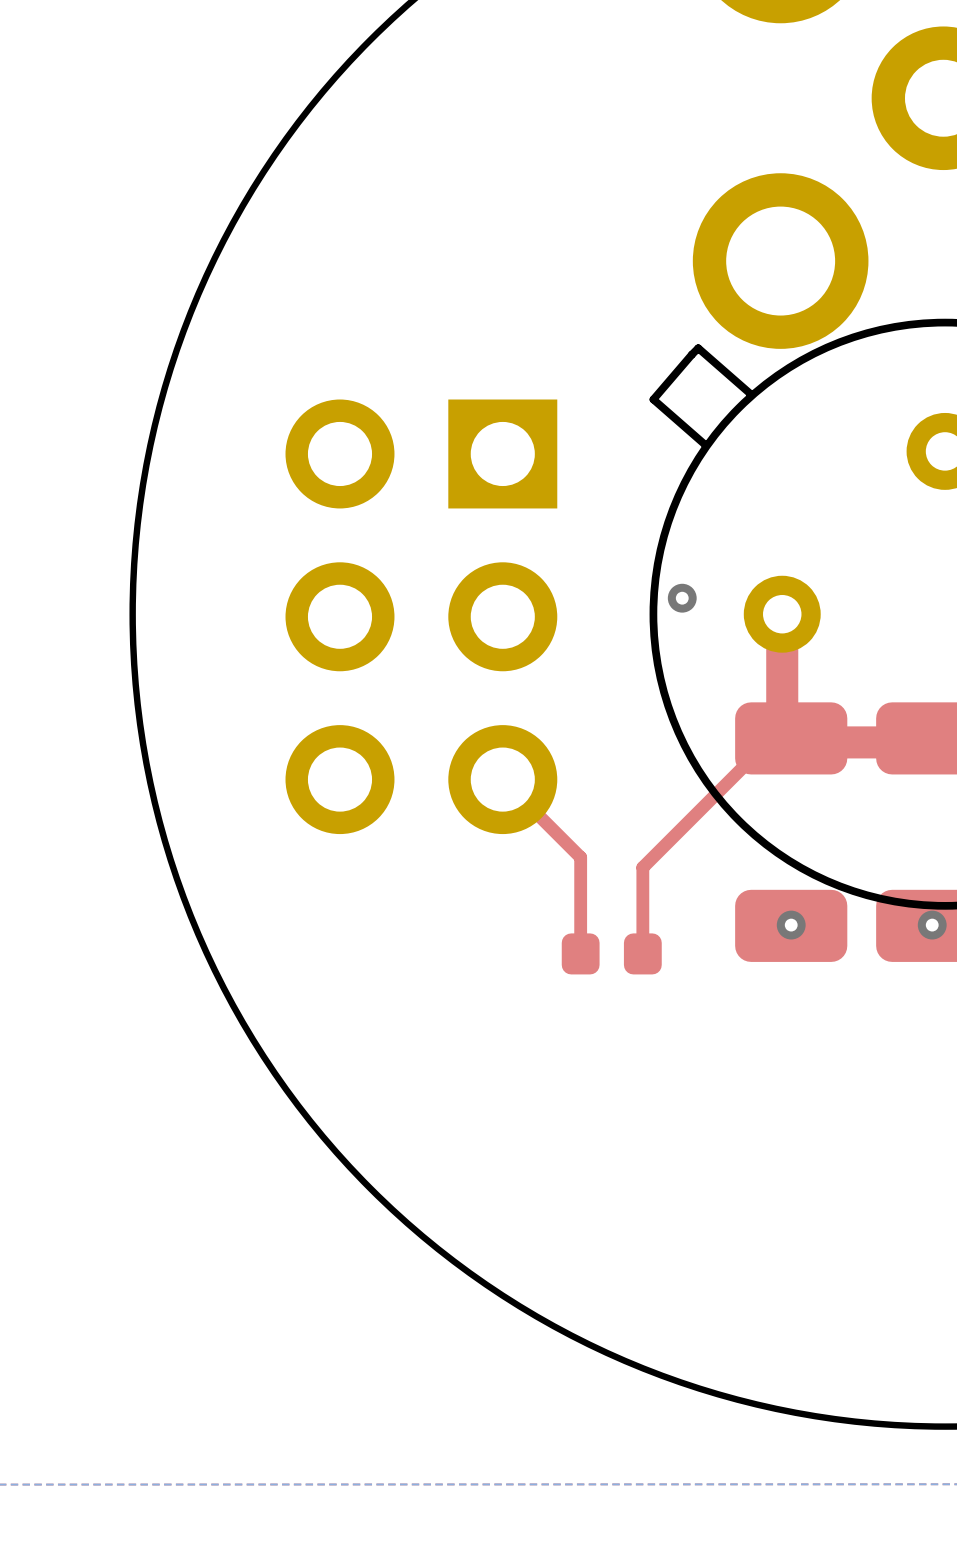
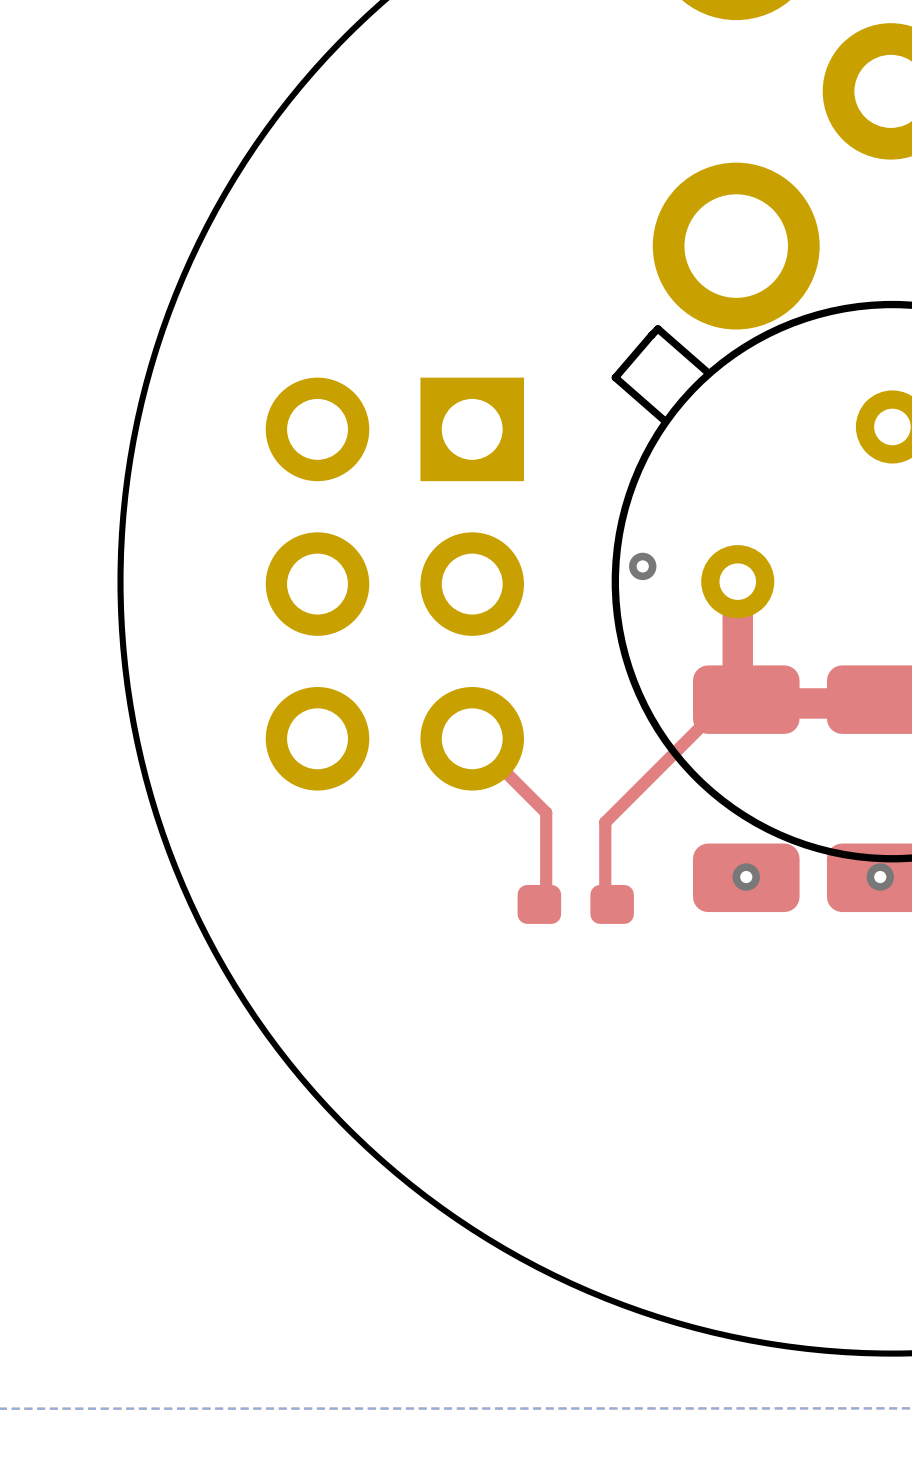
part footprint: [561, 933, 662, 975] -> [517, 884, 634, 924]

